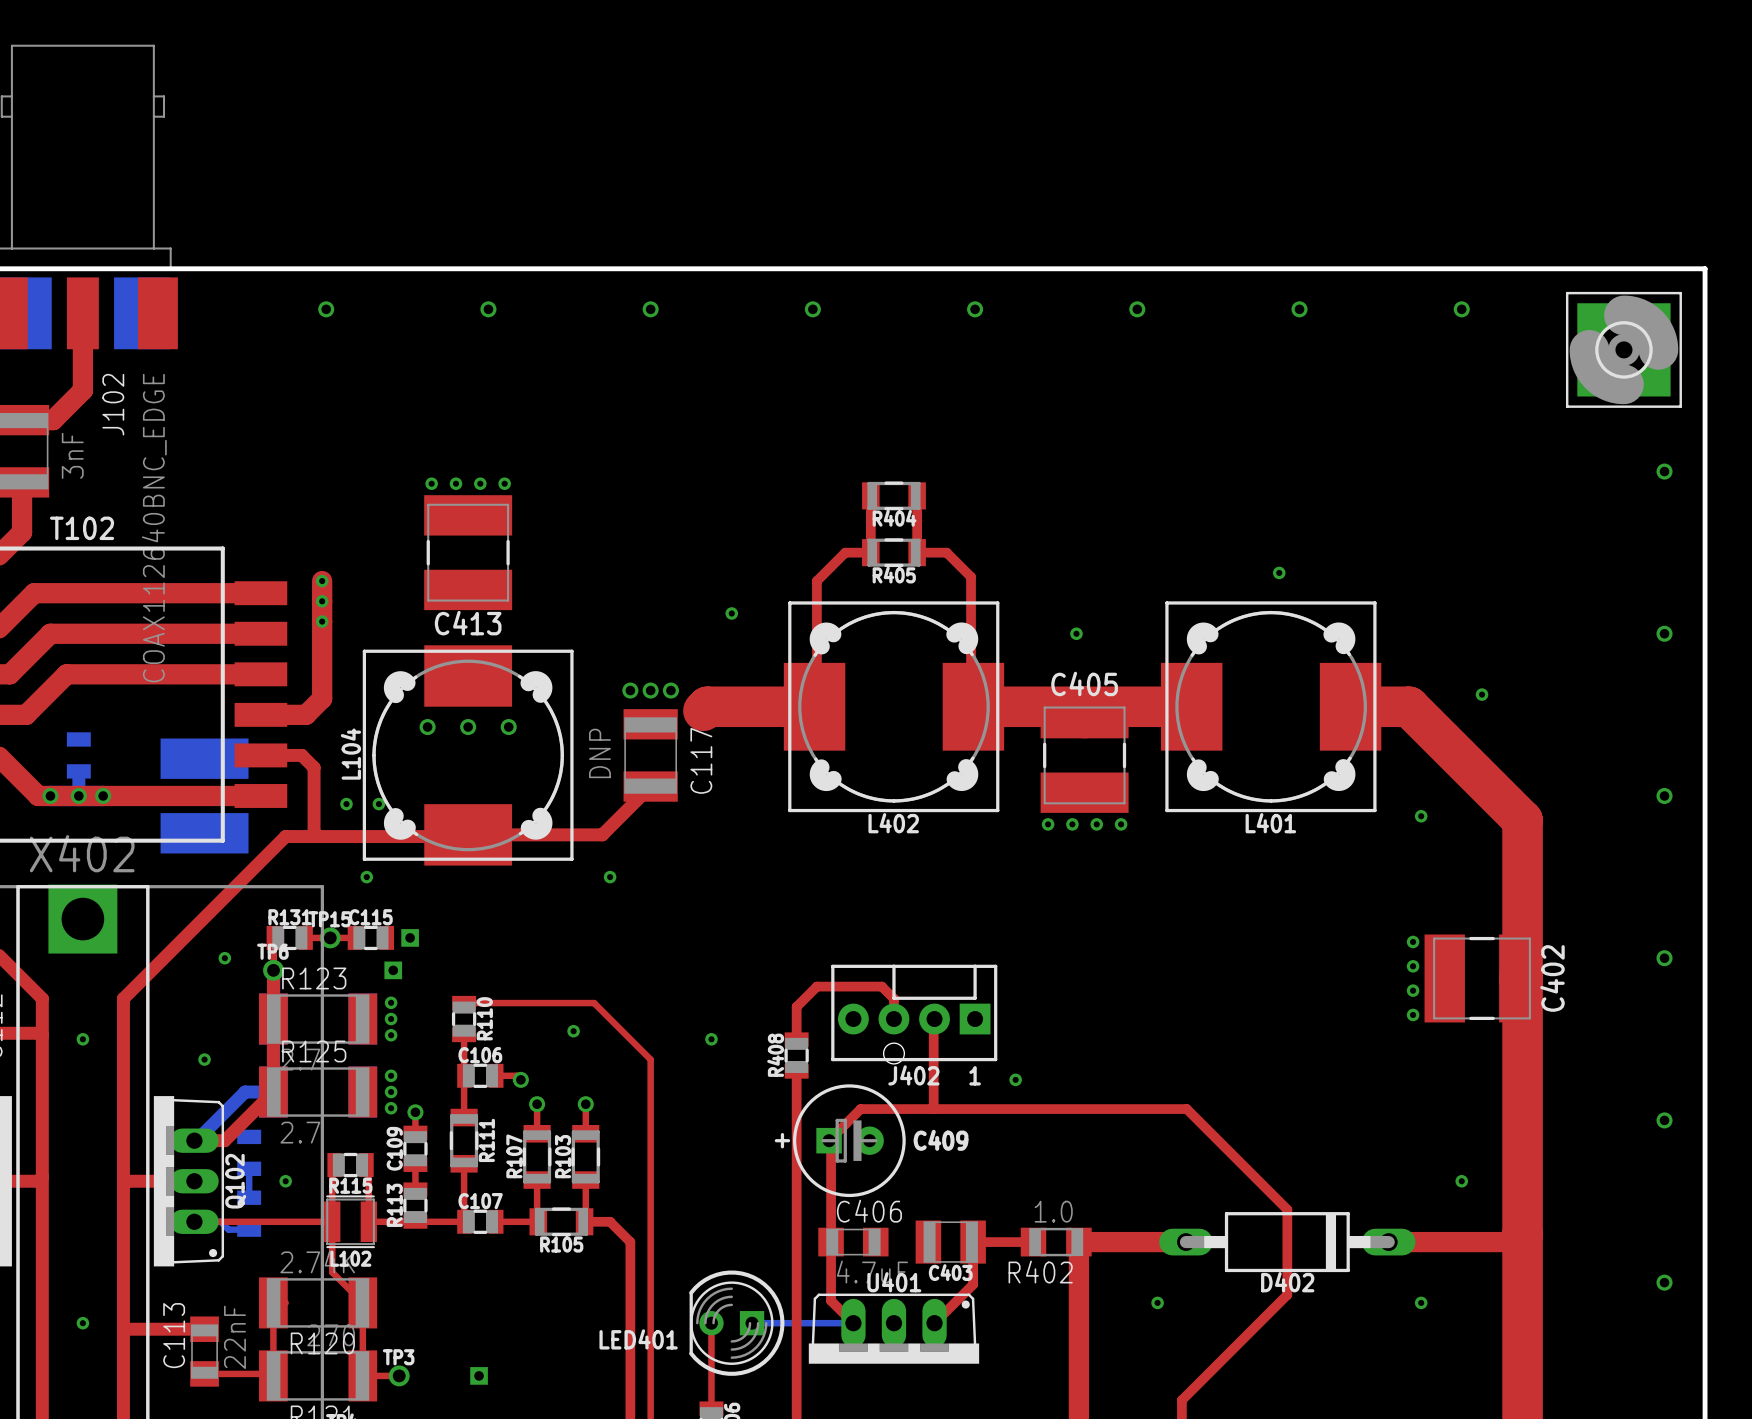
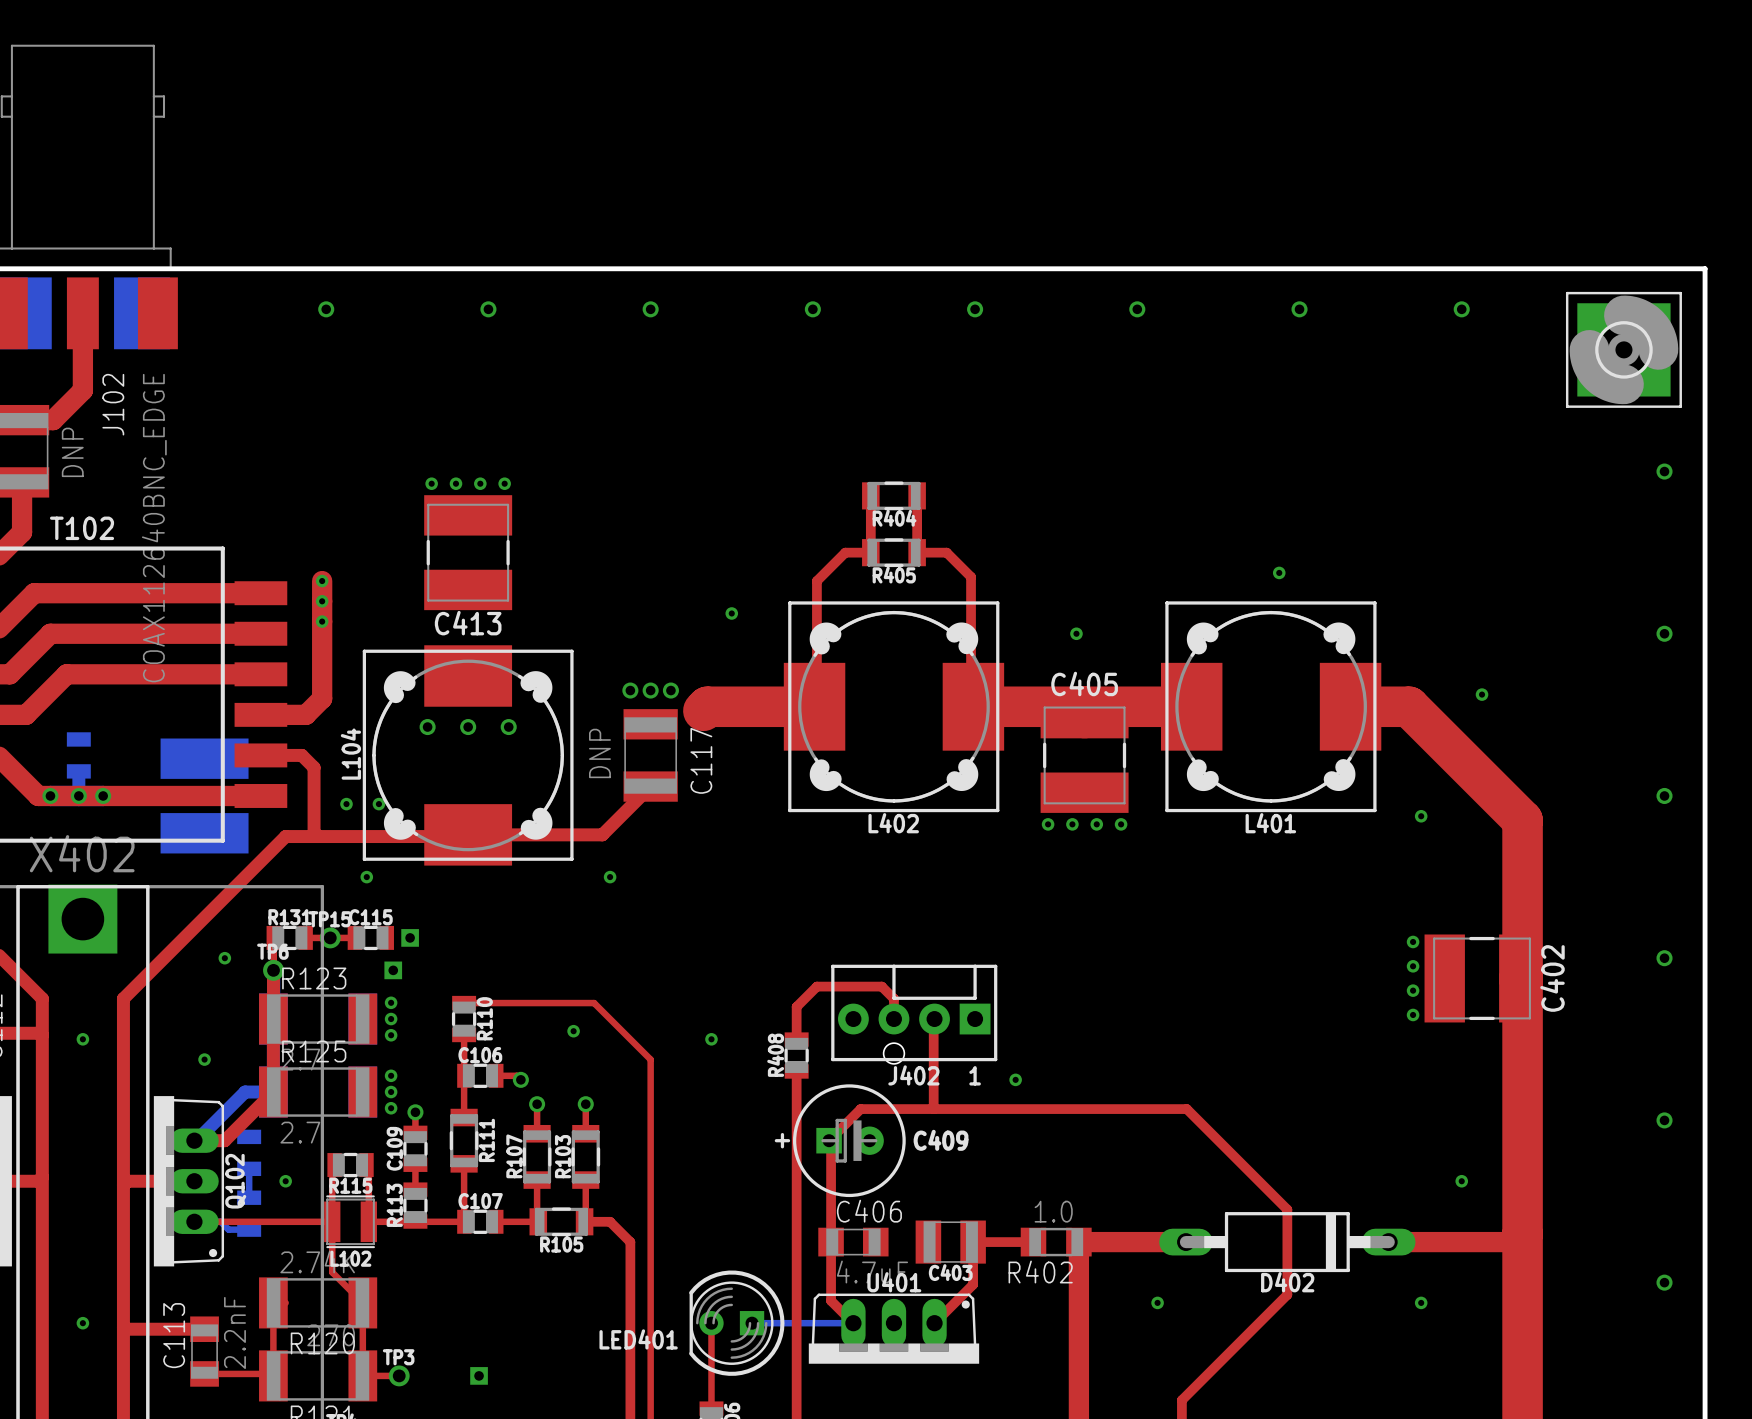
part value: 3nF (72, 455) -> DNP (72, 452)
C113 value: 22nF (234, 1337) -> 2.2nF (234, 1332)

